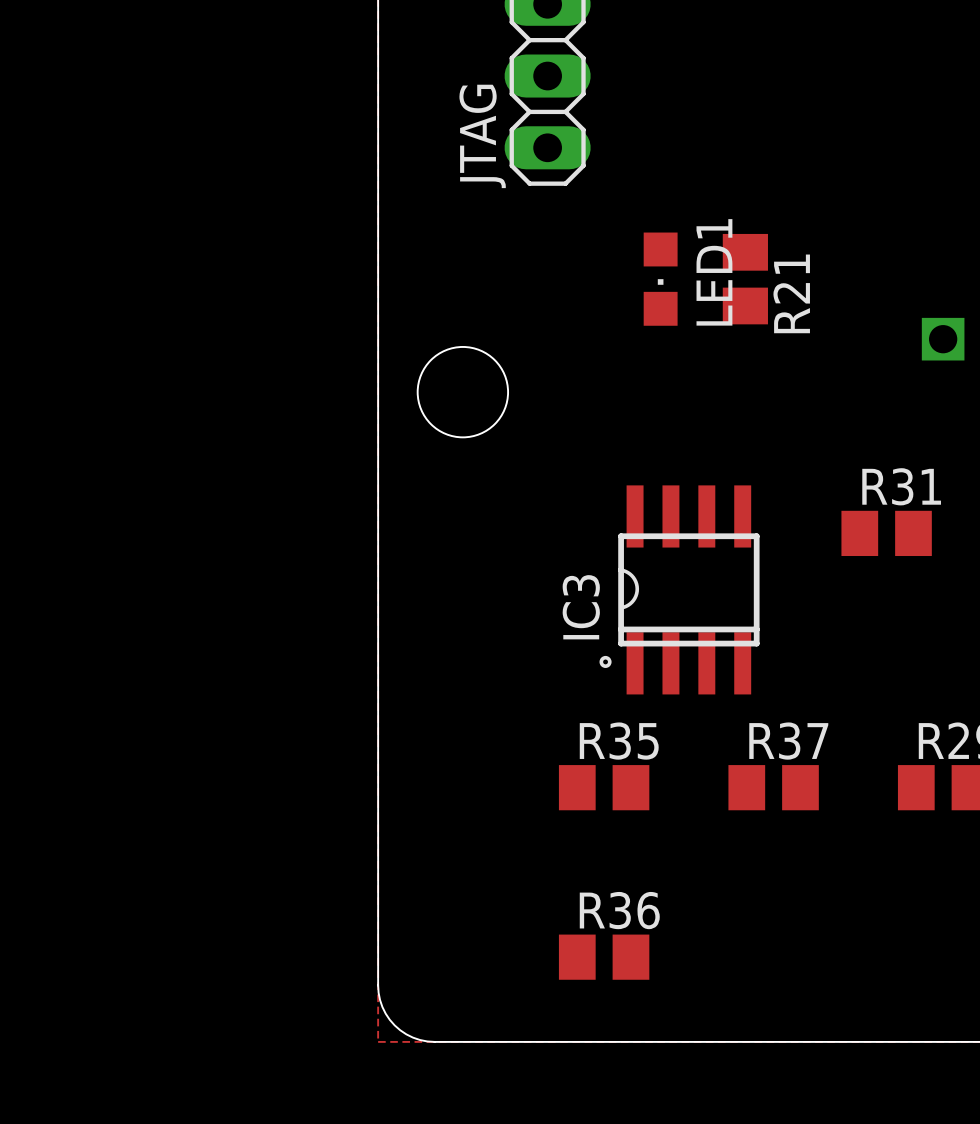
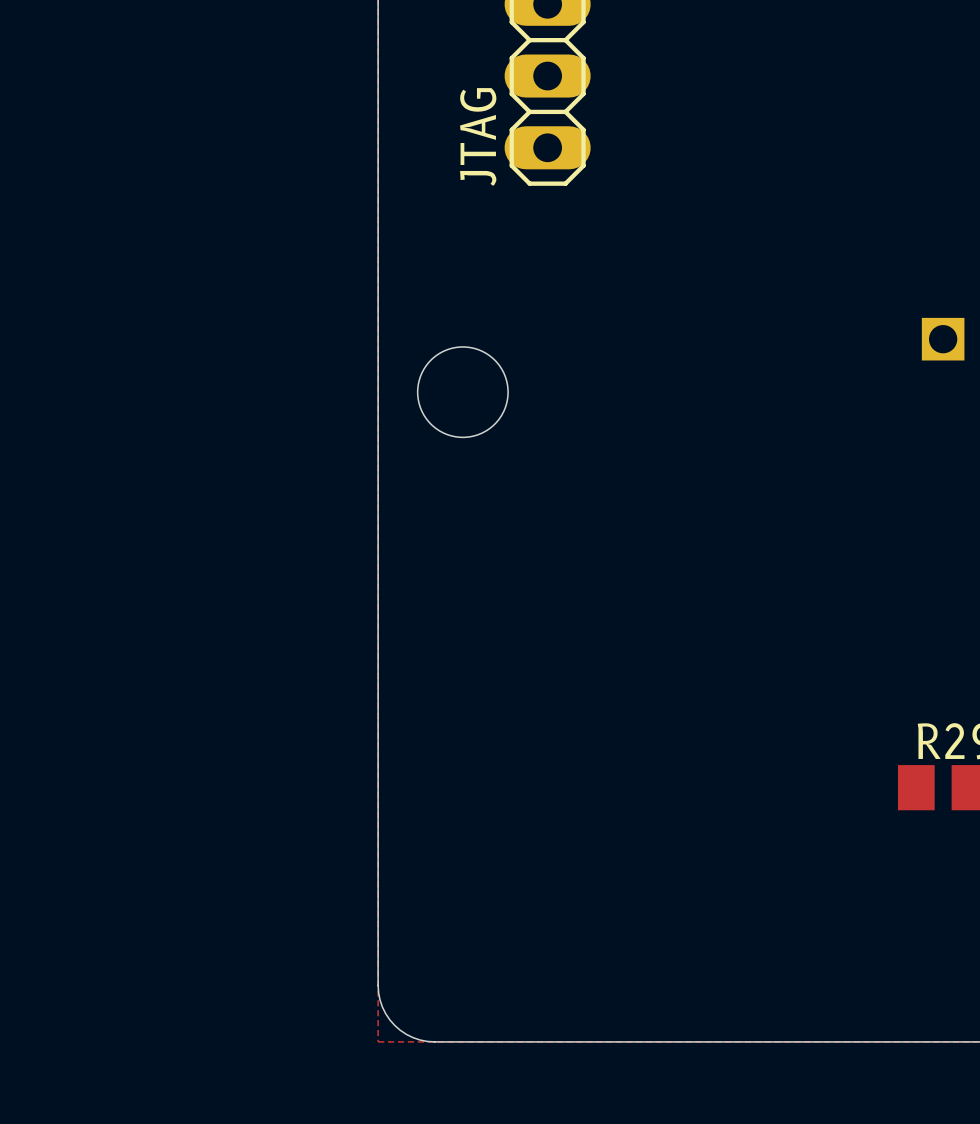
LED1: (660, 279) -> none
R21: (745, 279) -> none
R31: (886, 533) -> none
IC3: (679, 589) -> none
R35: (604, 787) -> none
R37: (773, 787) -> none
R36: (604, 957) -> none

